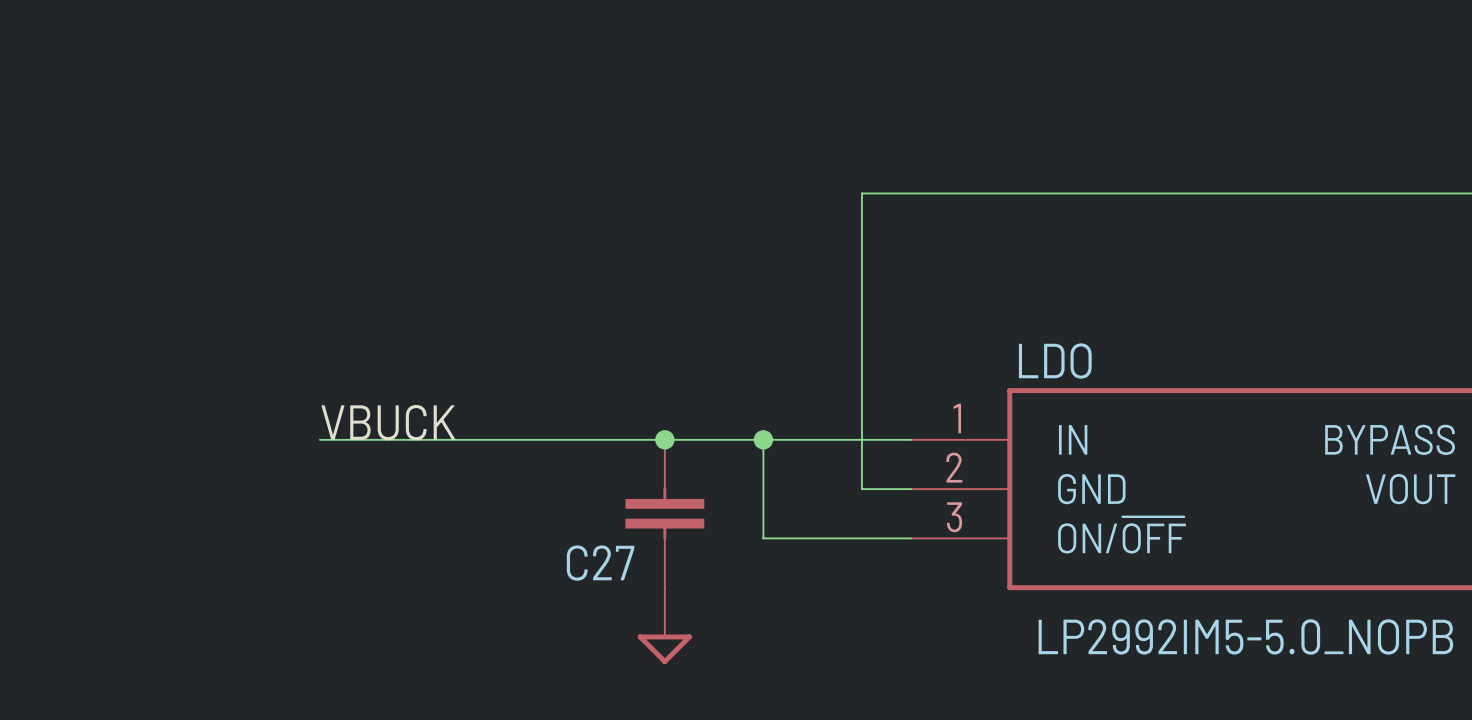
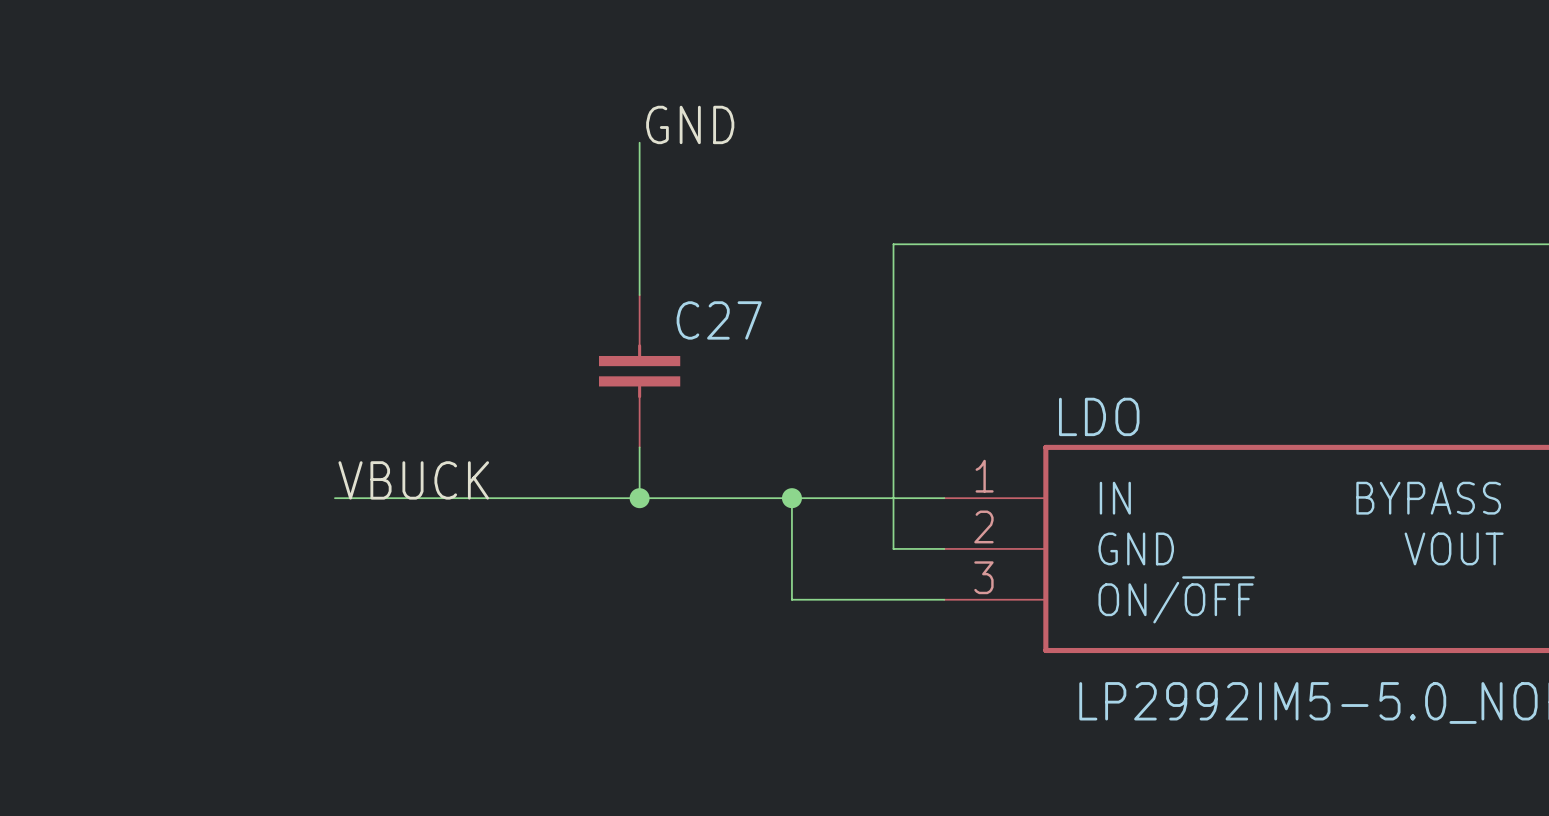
label: none -> GND (690, 124)
wire: none -> (639, 142) (639, 295)
wire: none -> (639, 447) (639, 498)
junction position: (664, 439) -> (639, 498)
C27 position: (664, 513) -> (639, 371)
C27 name position: C27 (600, 563) -> C27 (719, 320)
power symbol: (664, 625) -> none

